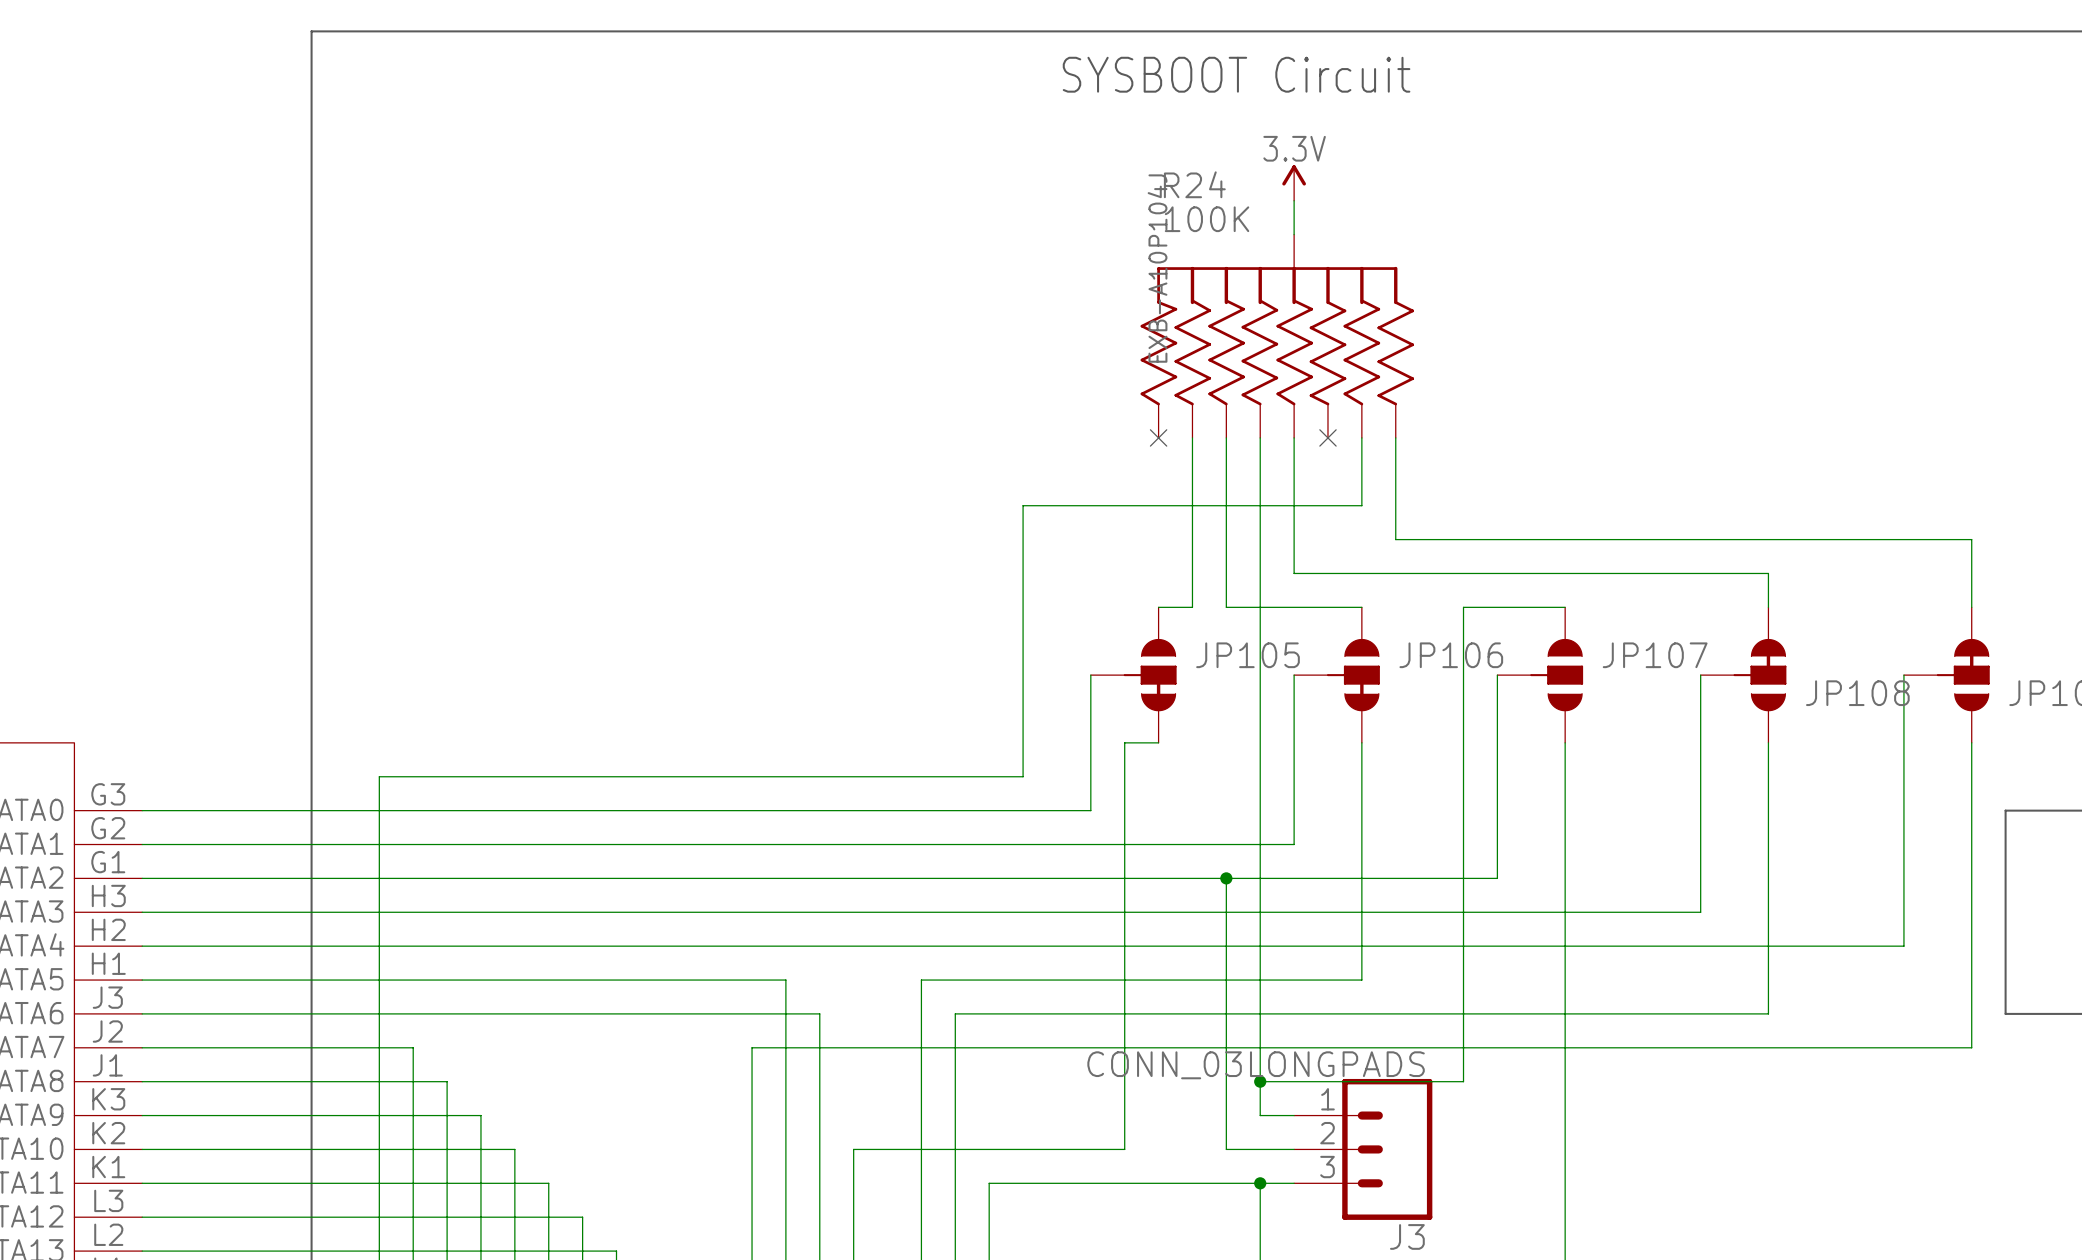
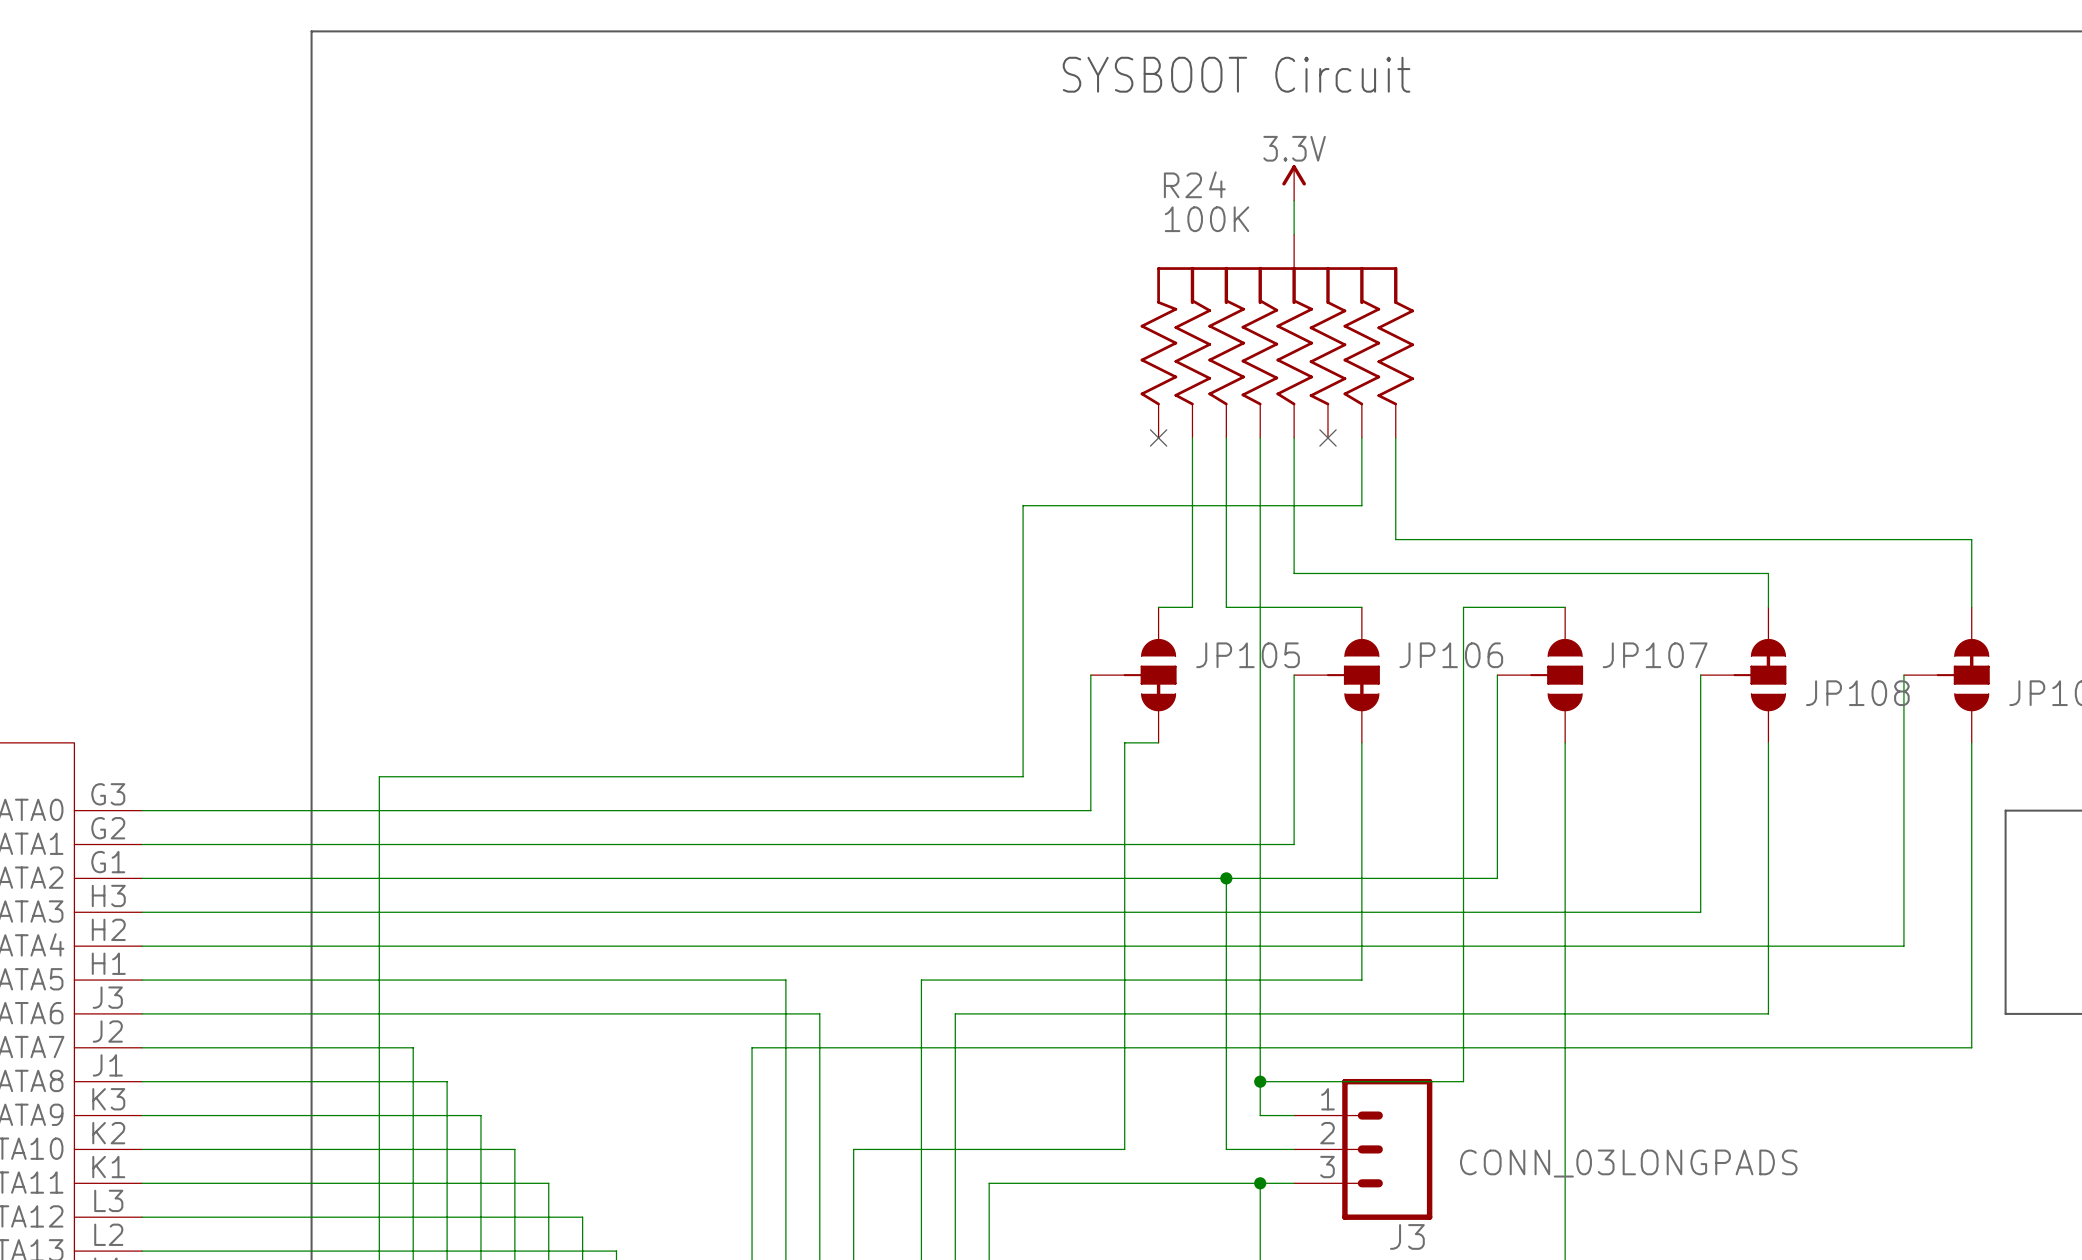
R24 text: EXB-A10P104J (1157, 268) -> none
J3 value position: CONN_03LONGPADS (1256, 1065) -> CONN_03LONGPADS (1628, 1163)

